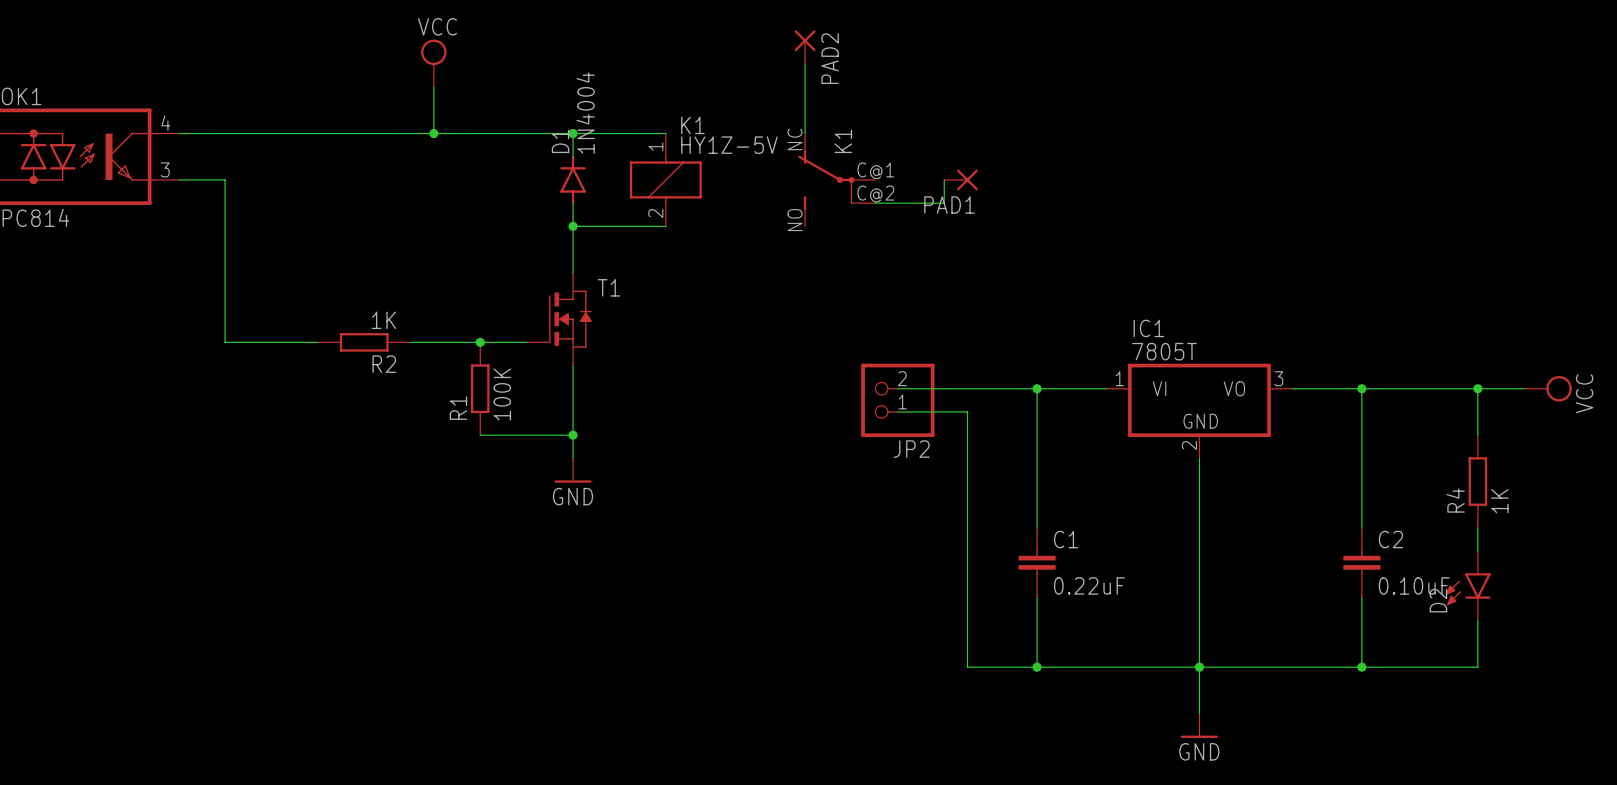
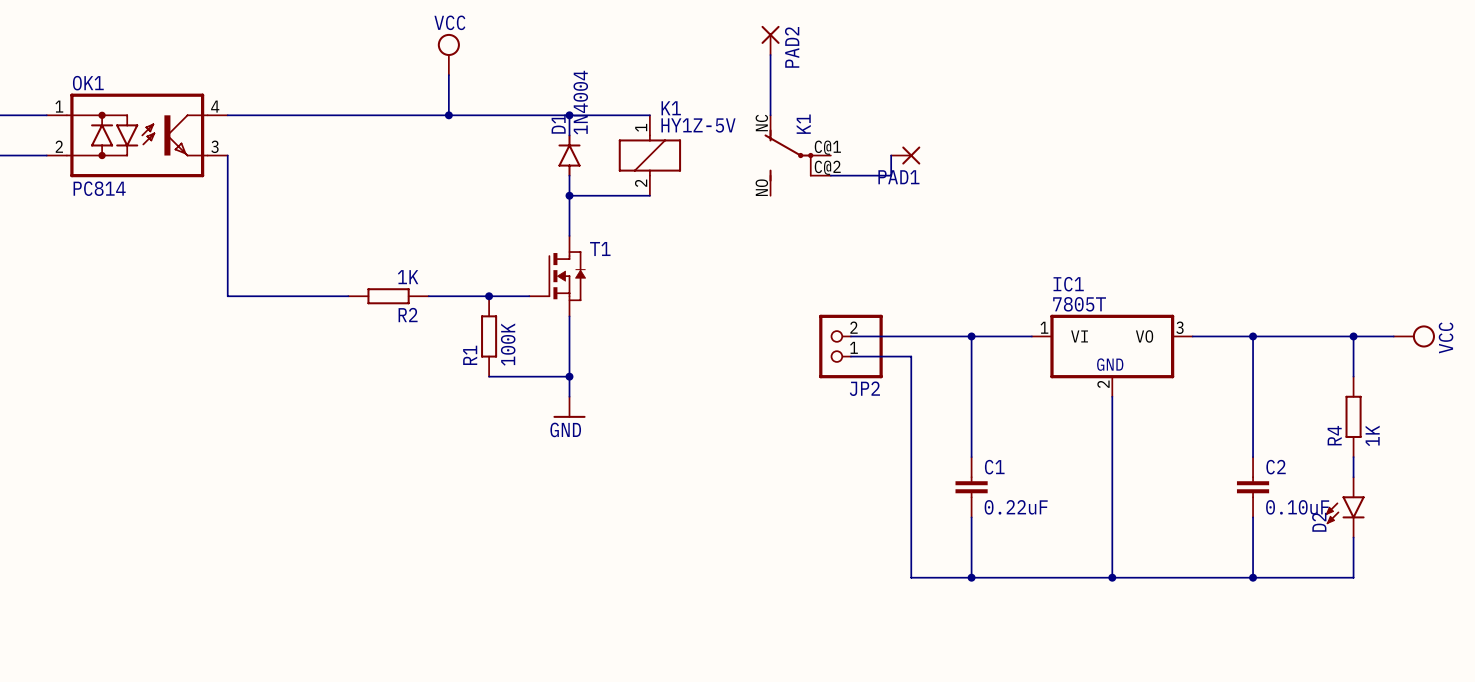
wire: (178, 179) (225, 179) (225, 342) -> (227, 155) (227, 296) (267, 296)
wire: (1199, 667) (1199, 713) -> none
power symbol: GND (1199, 725) -> none

